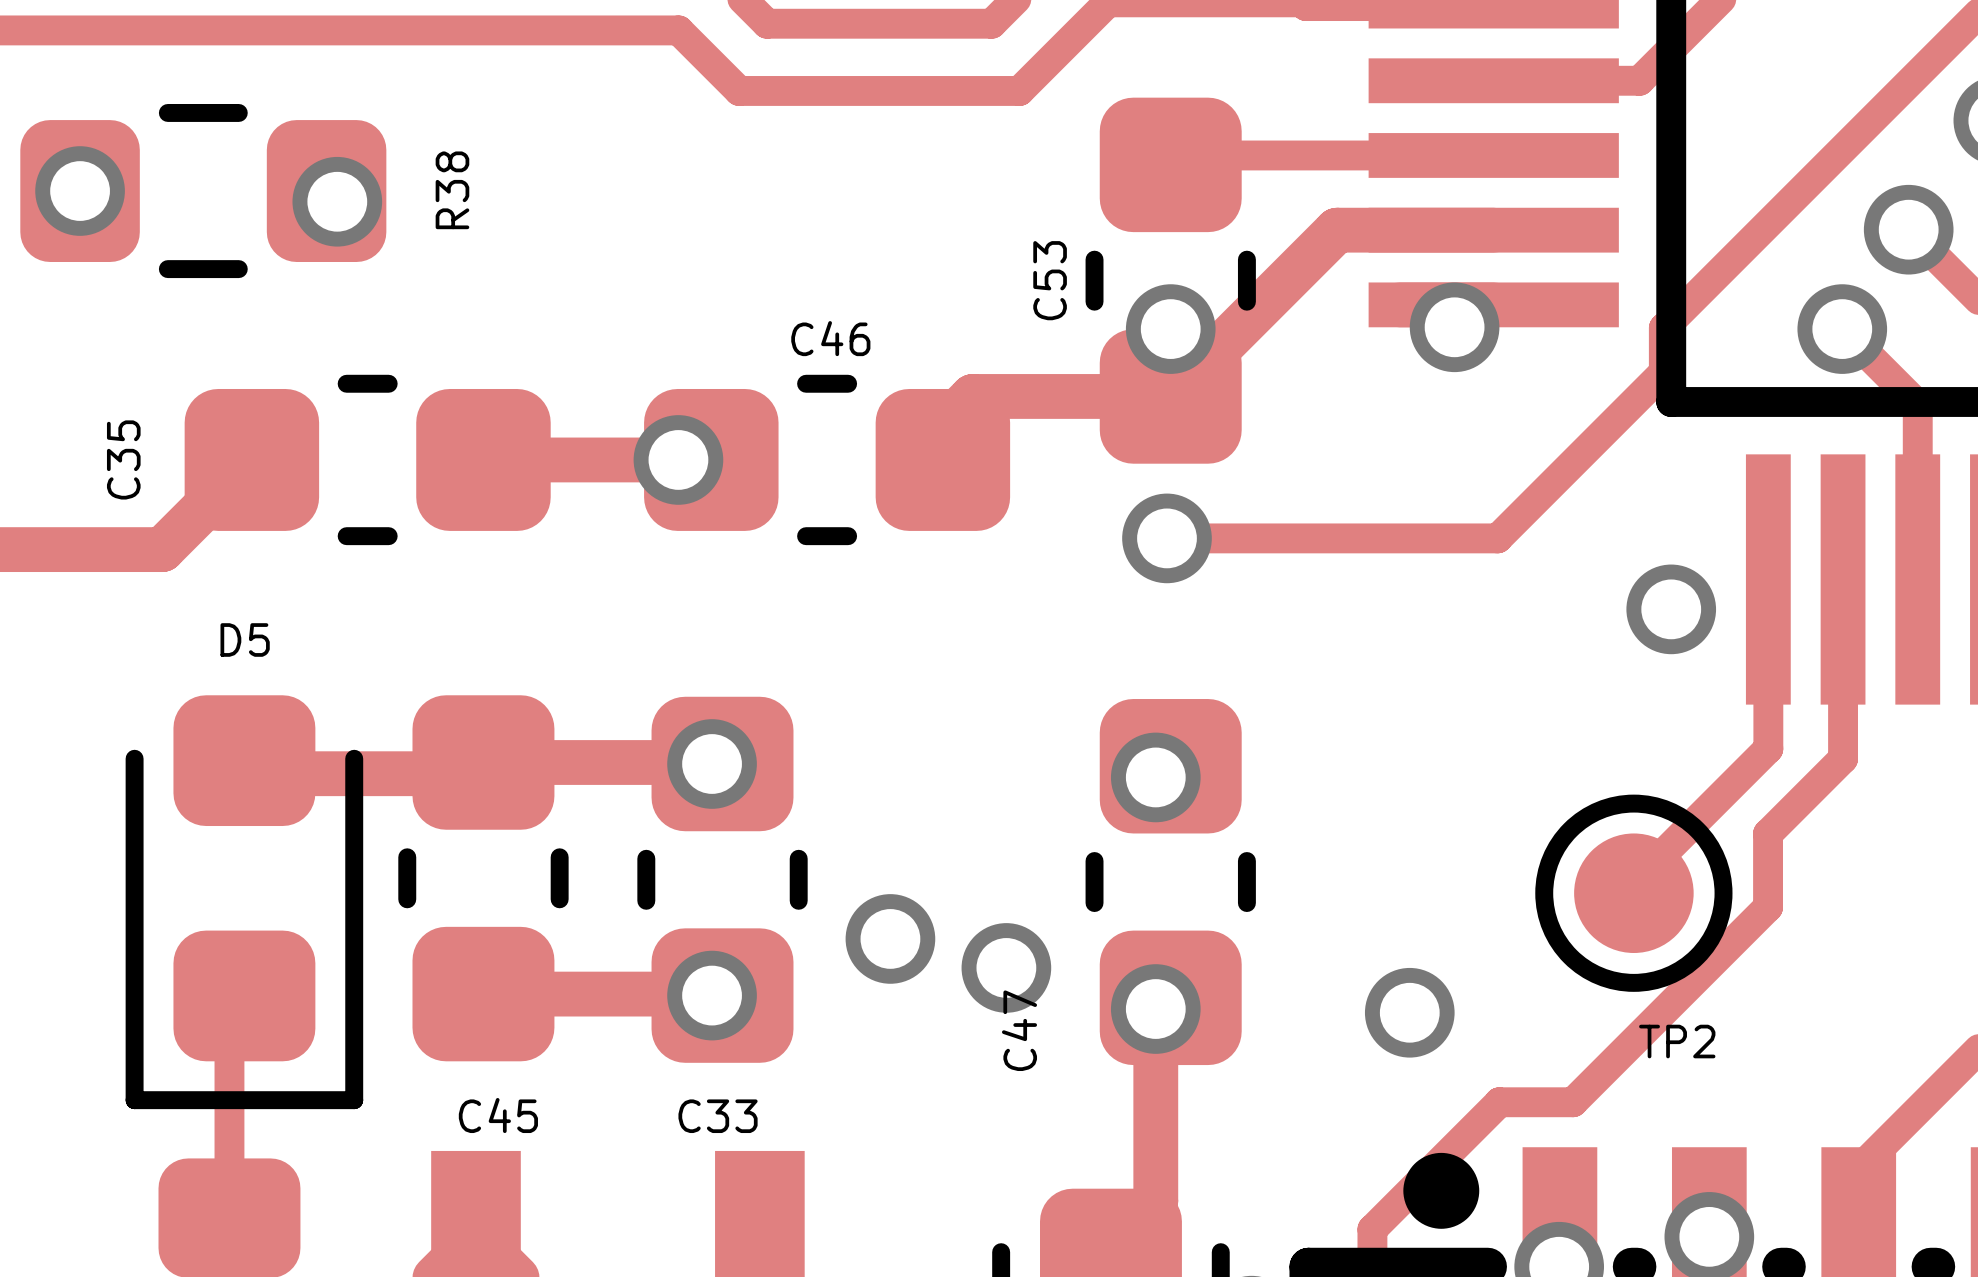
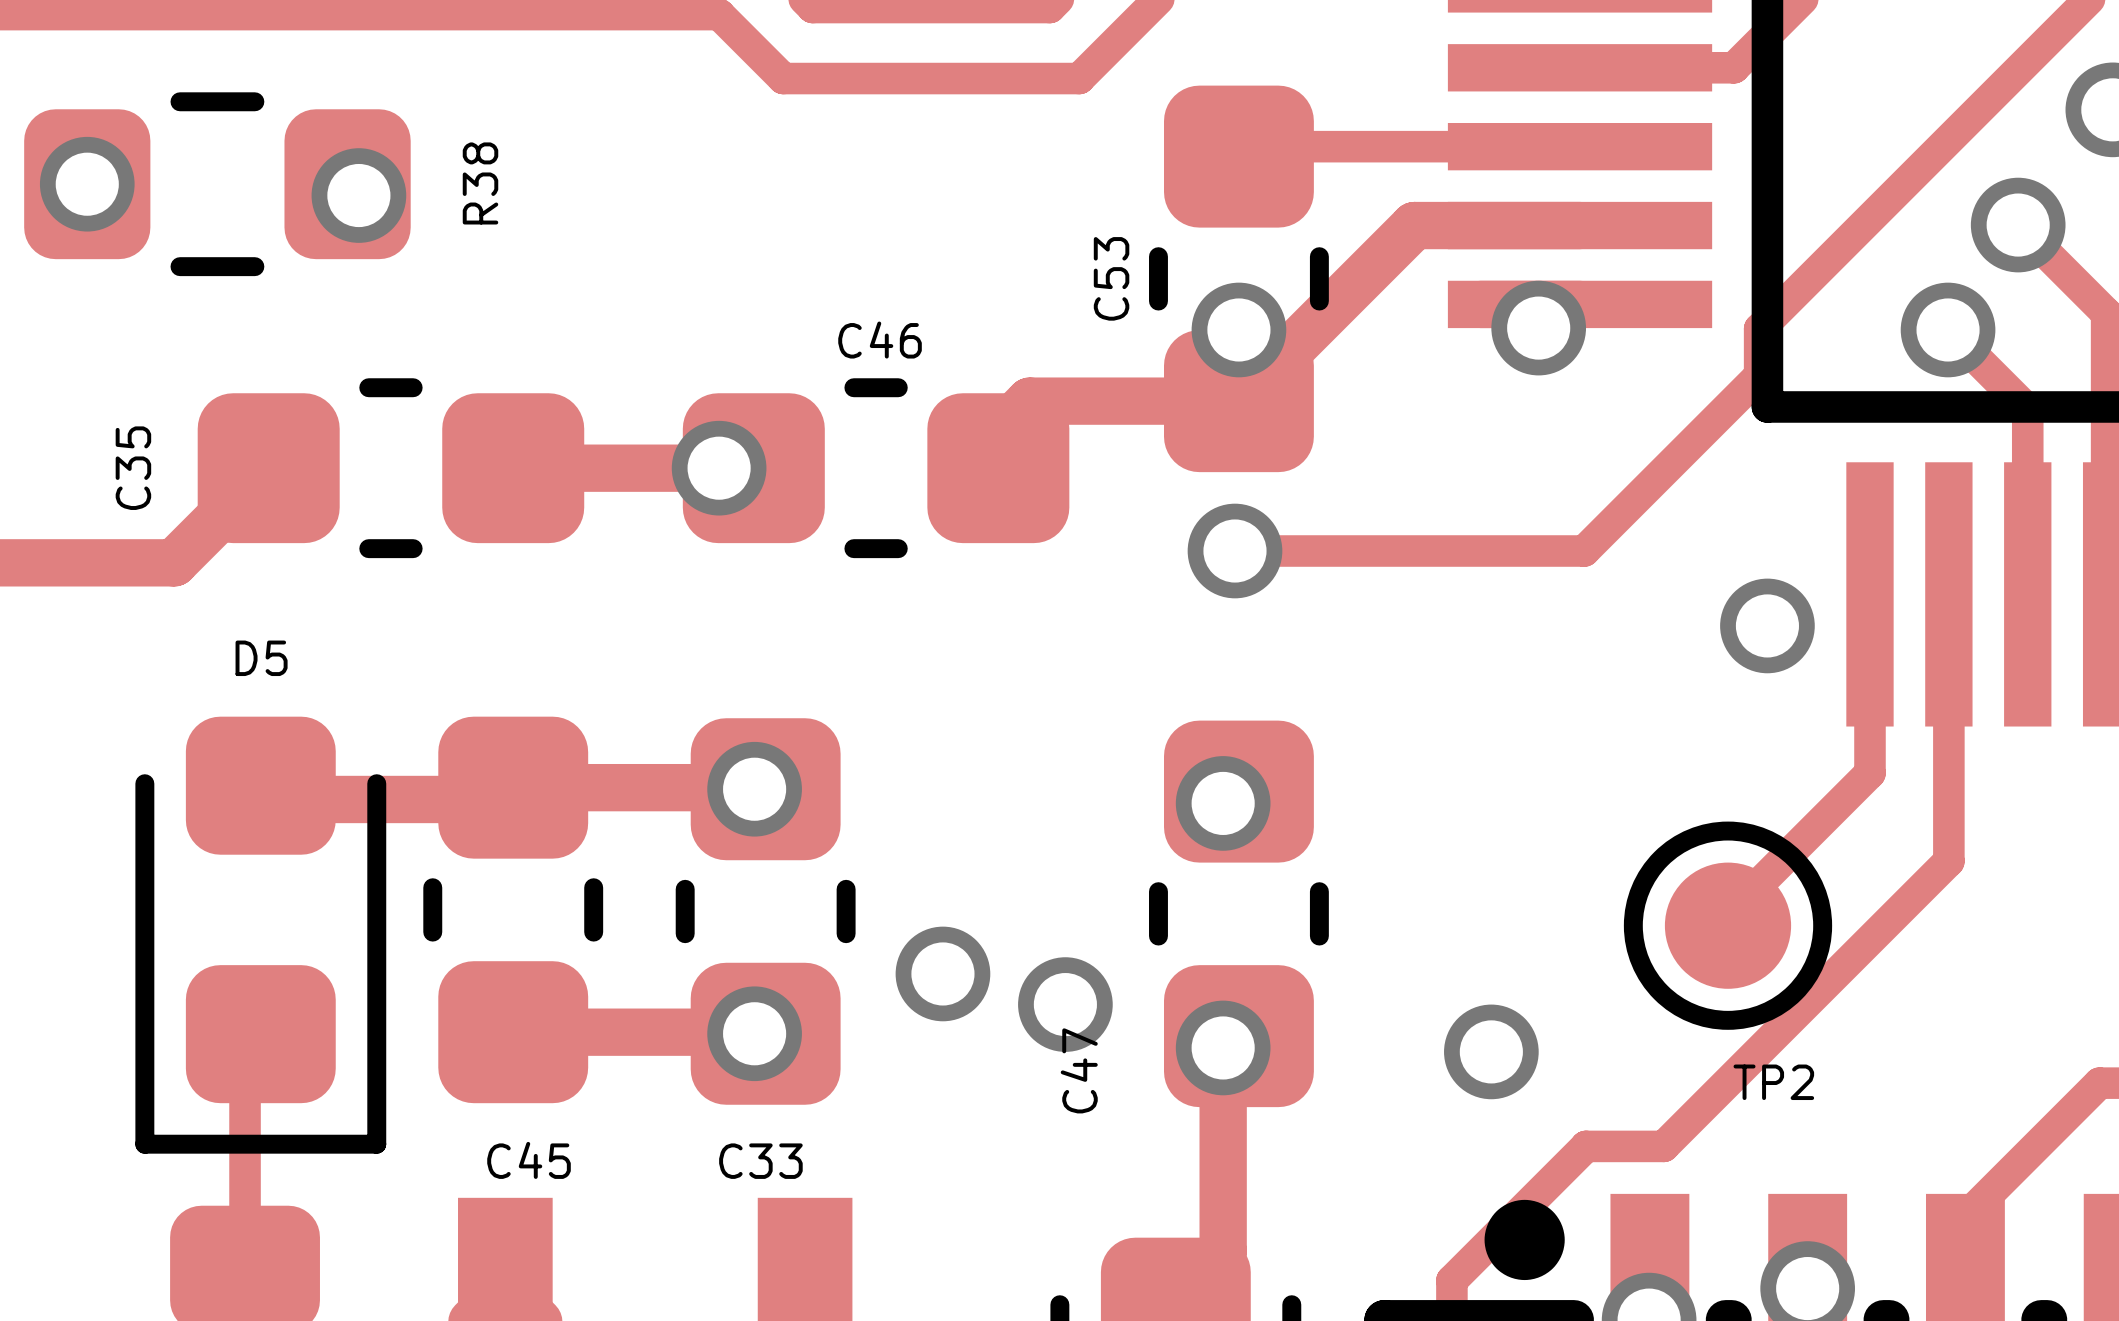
track: (1843, 758) (1768, 833) (1768, 907) -> (1948, 783) (1948, 861) (1869, 940)

